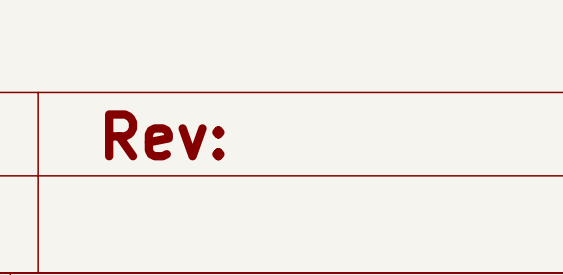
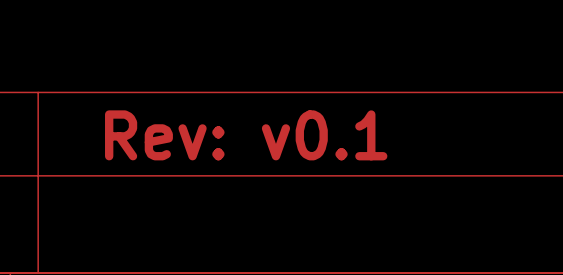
title block: Rev: (164, 135) -> Rev: v0.1 (246, 135)

